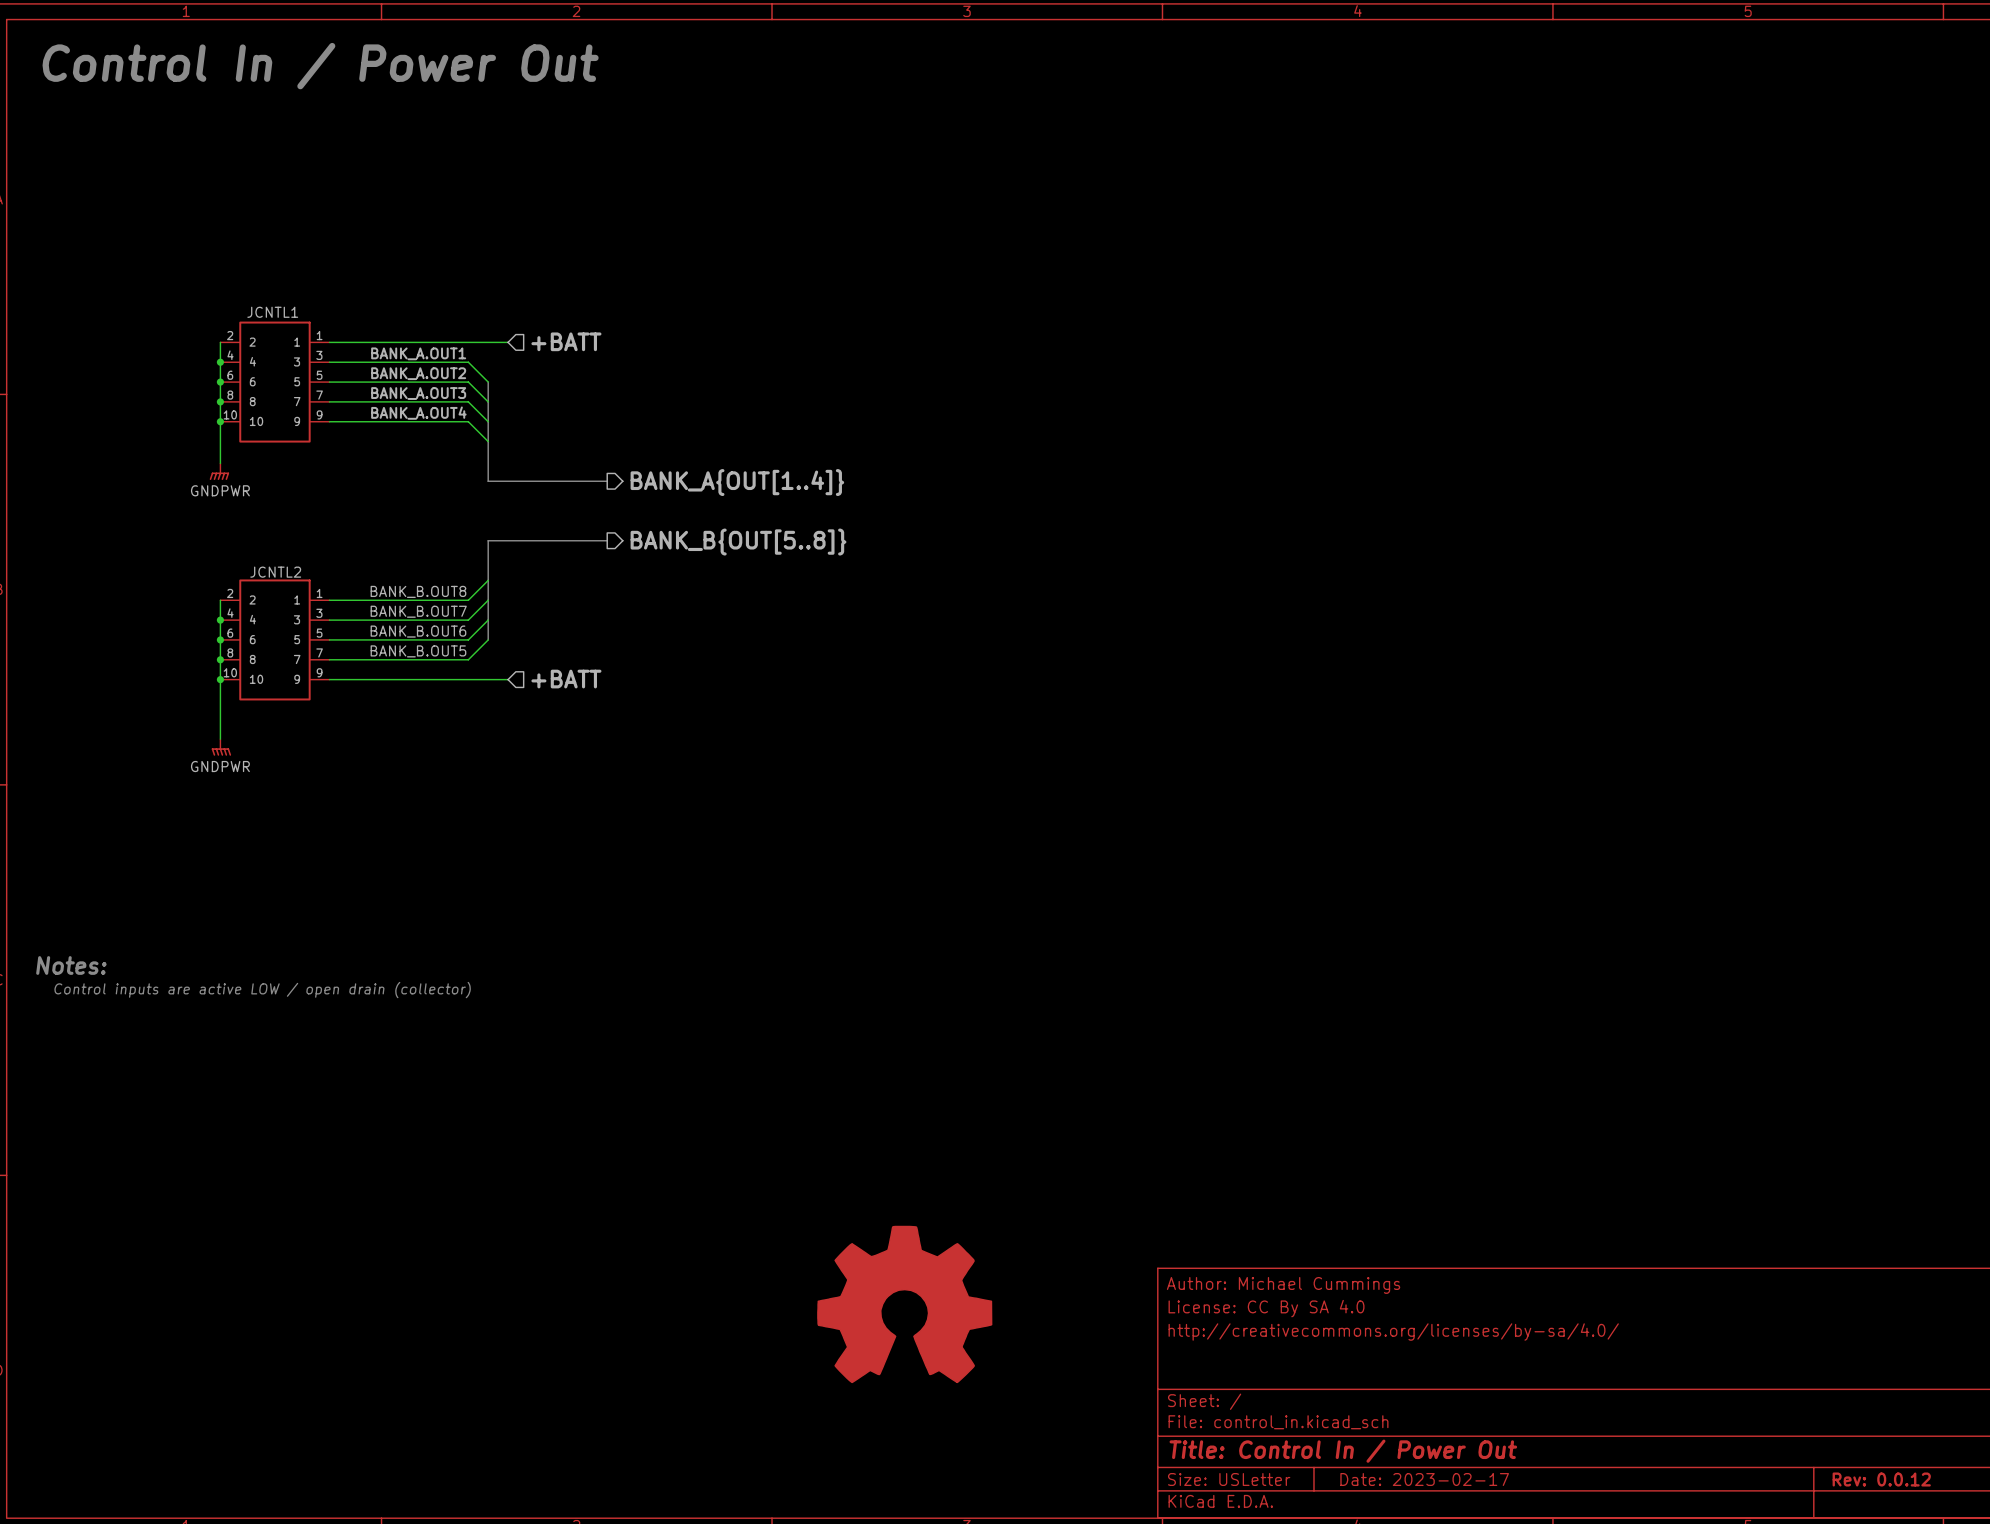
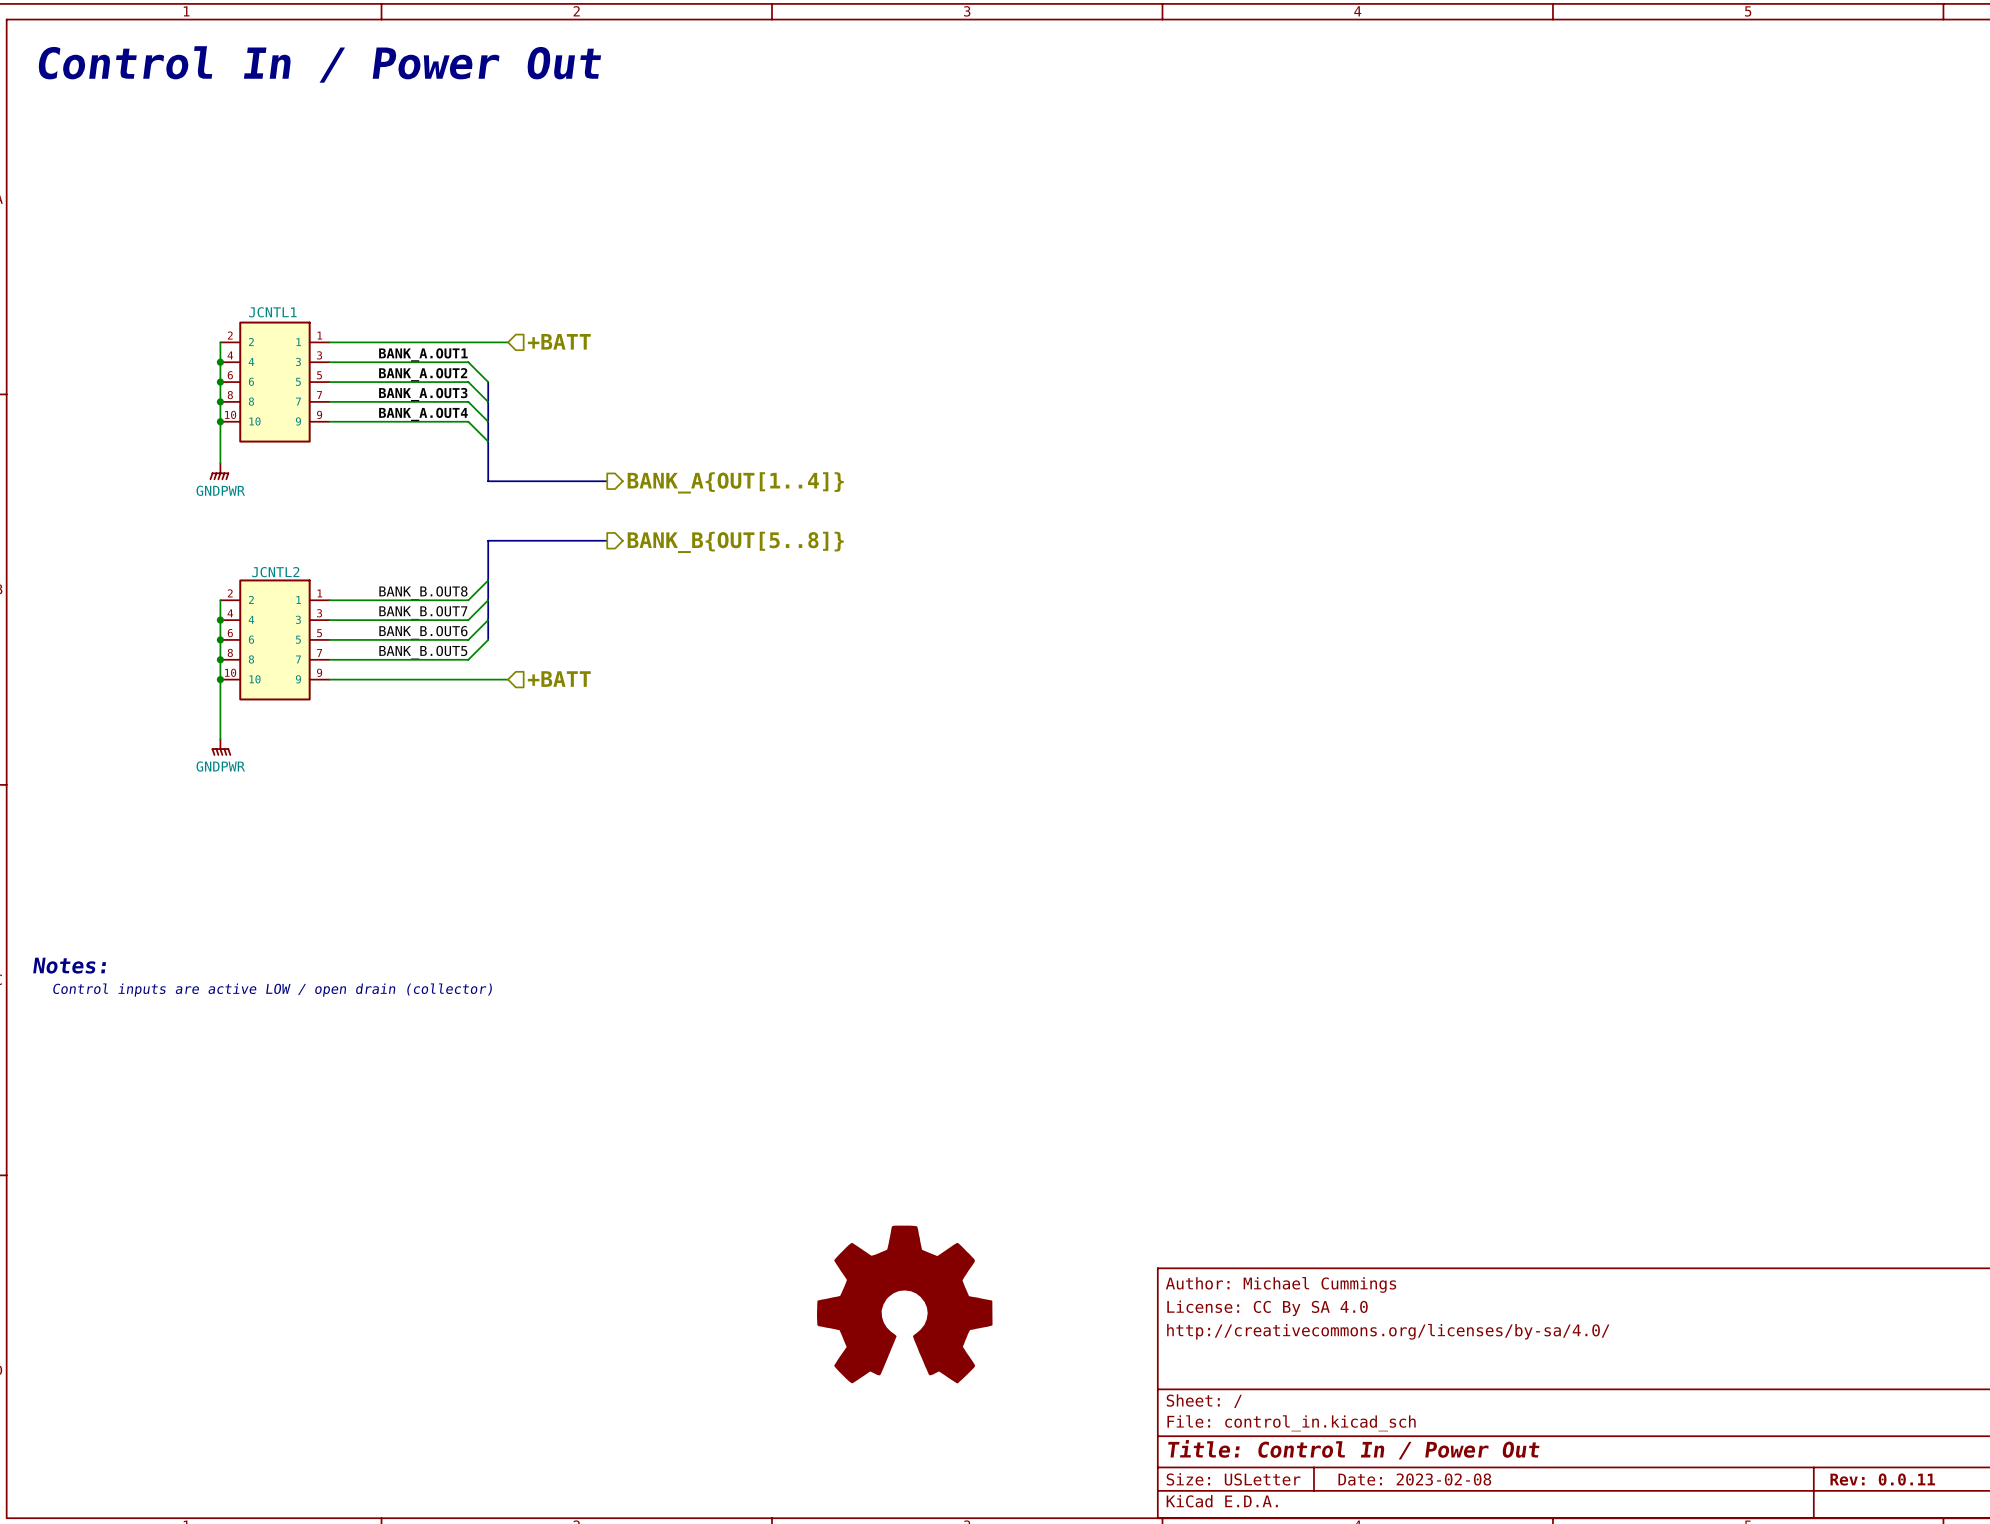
title block: Date: 2023-02-17 (1424, 1479) -> Date: 2023-02-08 (1414, 1479)
title block: Rev: 0.0.12 (1881, 1479) -> Rev: 0.0.11 (1882, 1479)

